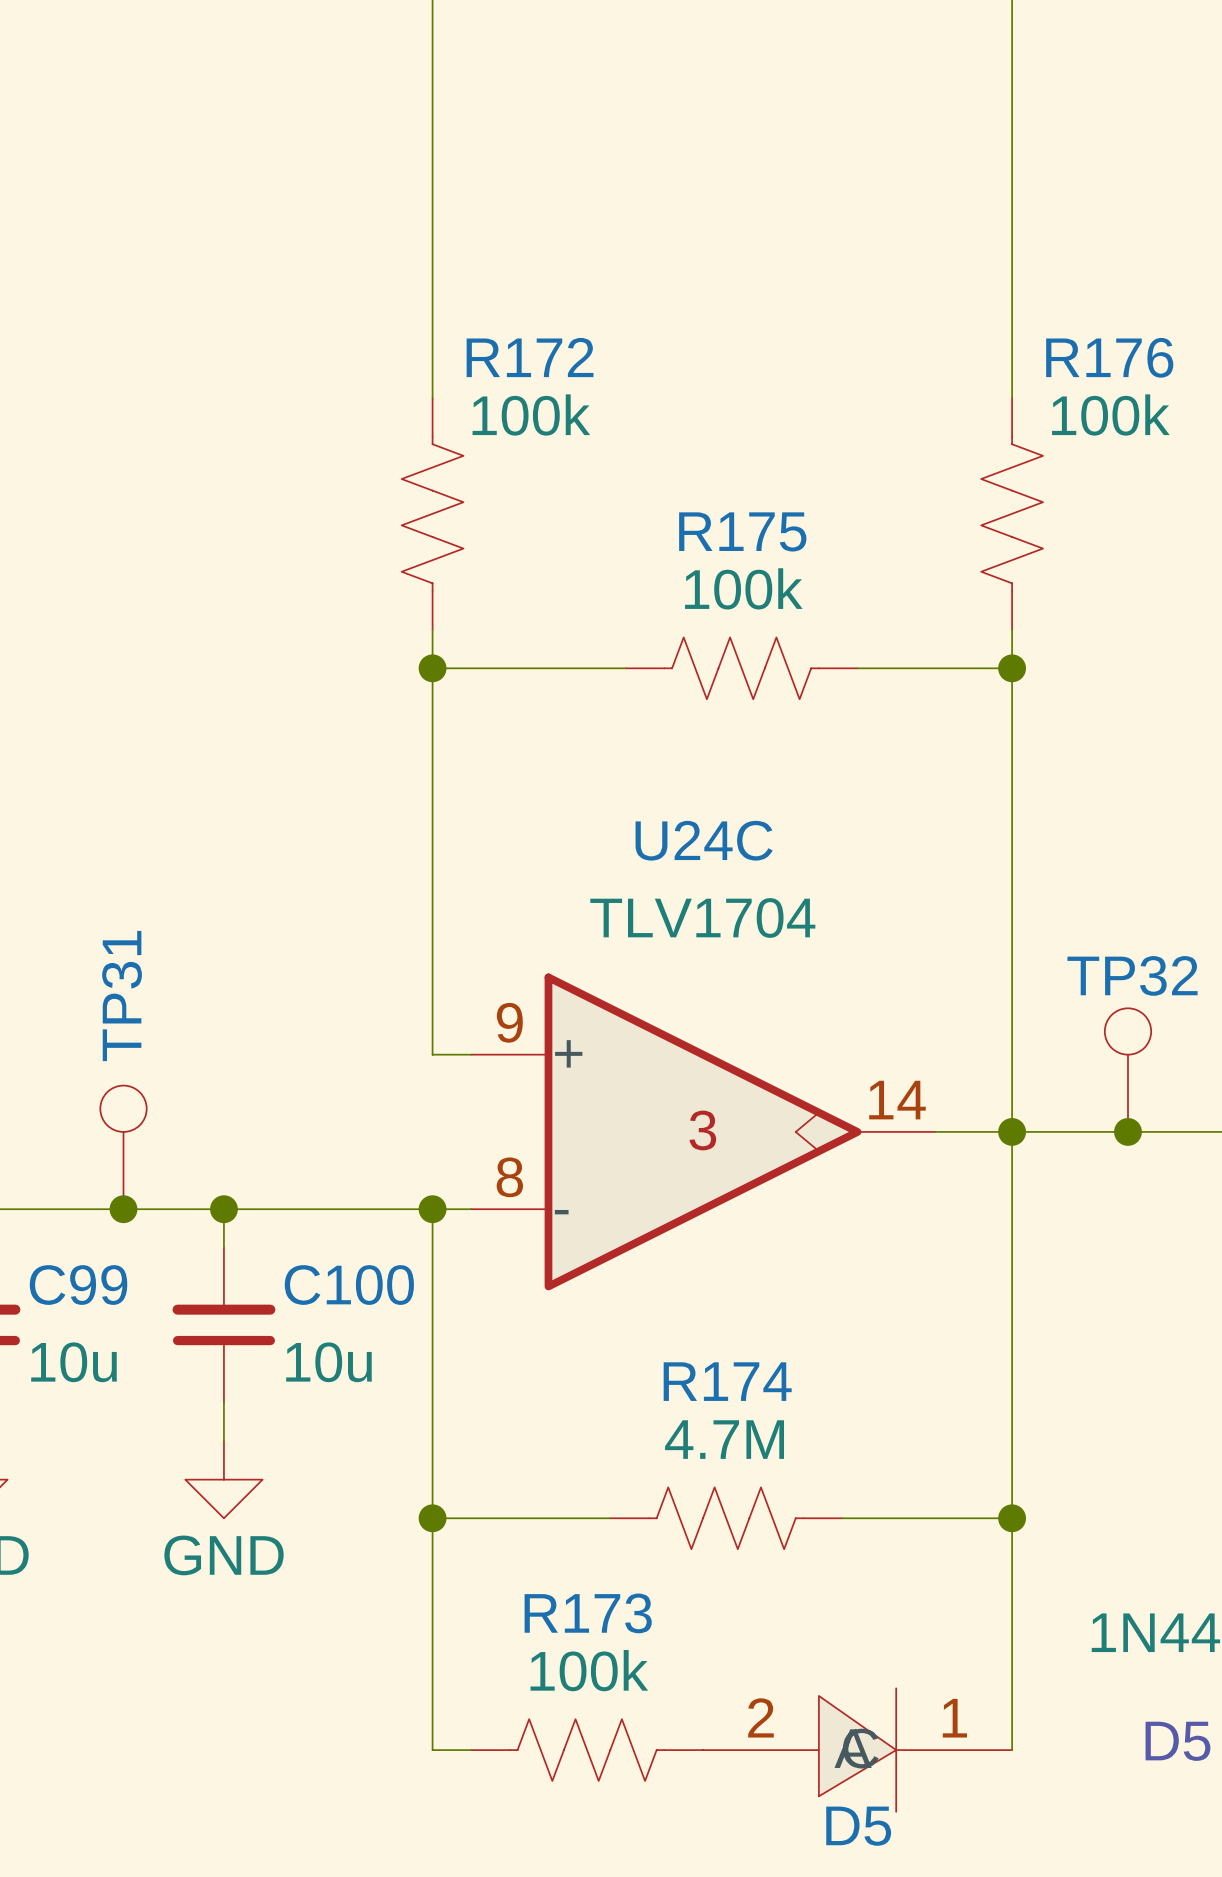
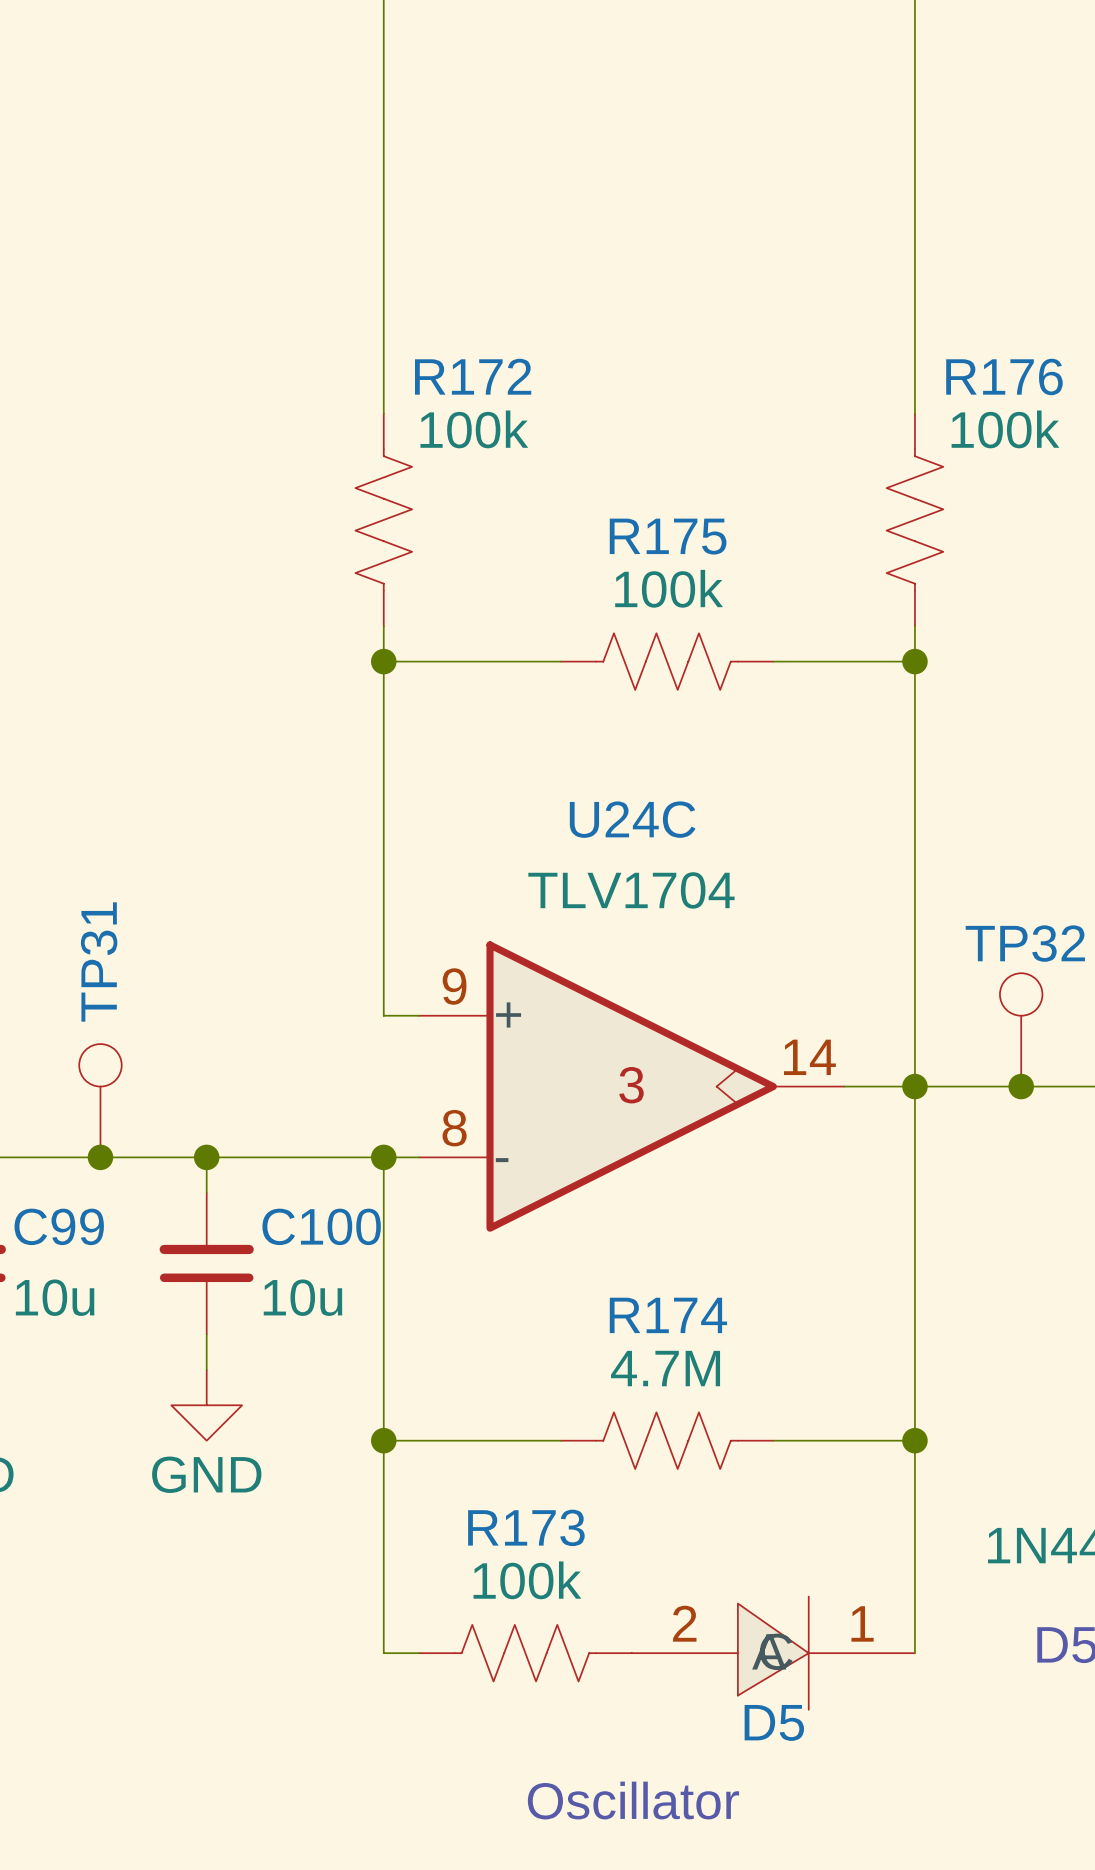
wire: (223, 1209) (223, 1247) -> (206, 1157) (206, 1192)
junction position: (223, 1209) -> (206, 1157)
C100 position: (223, 1325) -> (206, 1263)
wire: (223, 1402) (223, 1441) -> (206, 1334) (206, 1369)
power symbol position: GND (223, 1479) -> GND (206, 1405)
R174 position: (726, 1518) -> (667, 1440)

